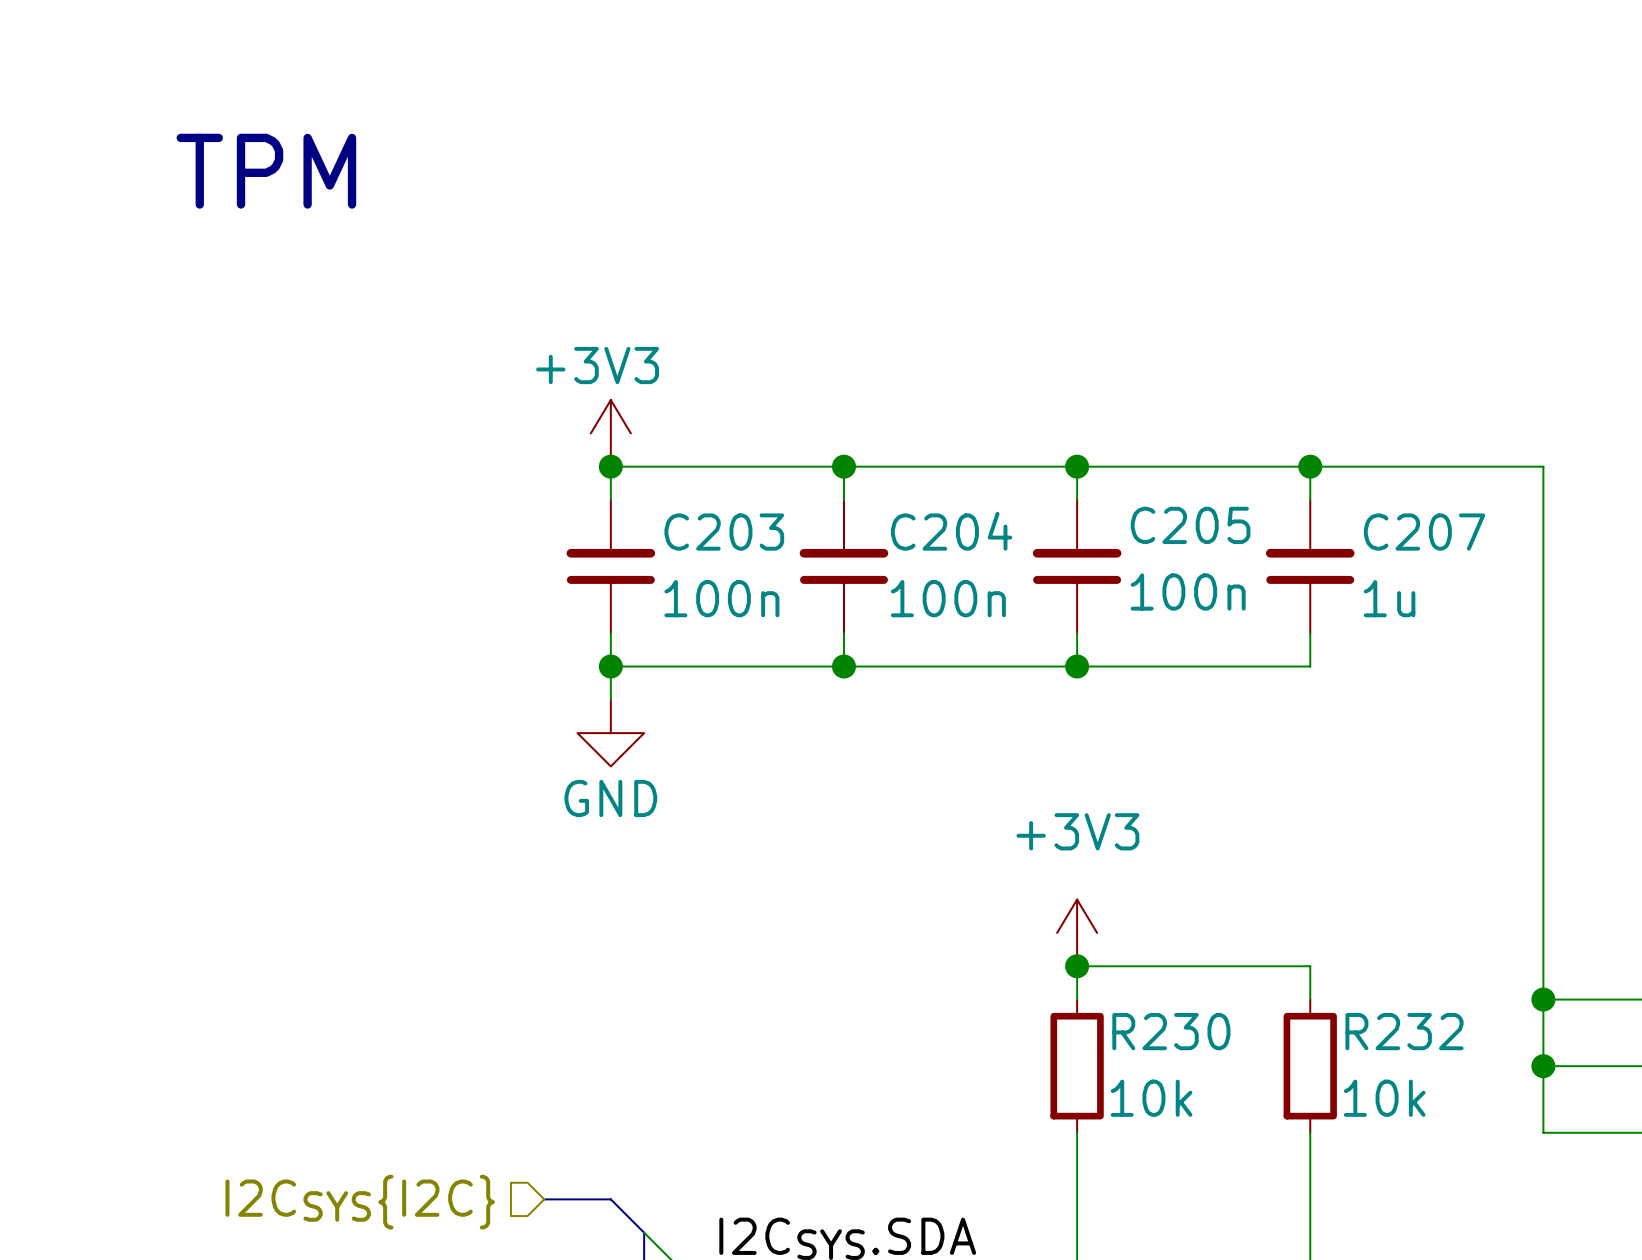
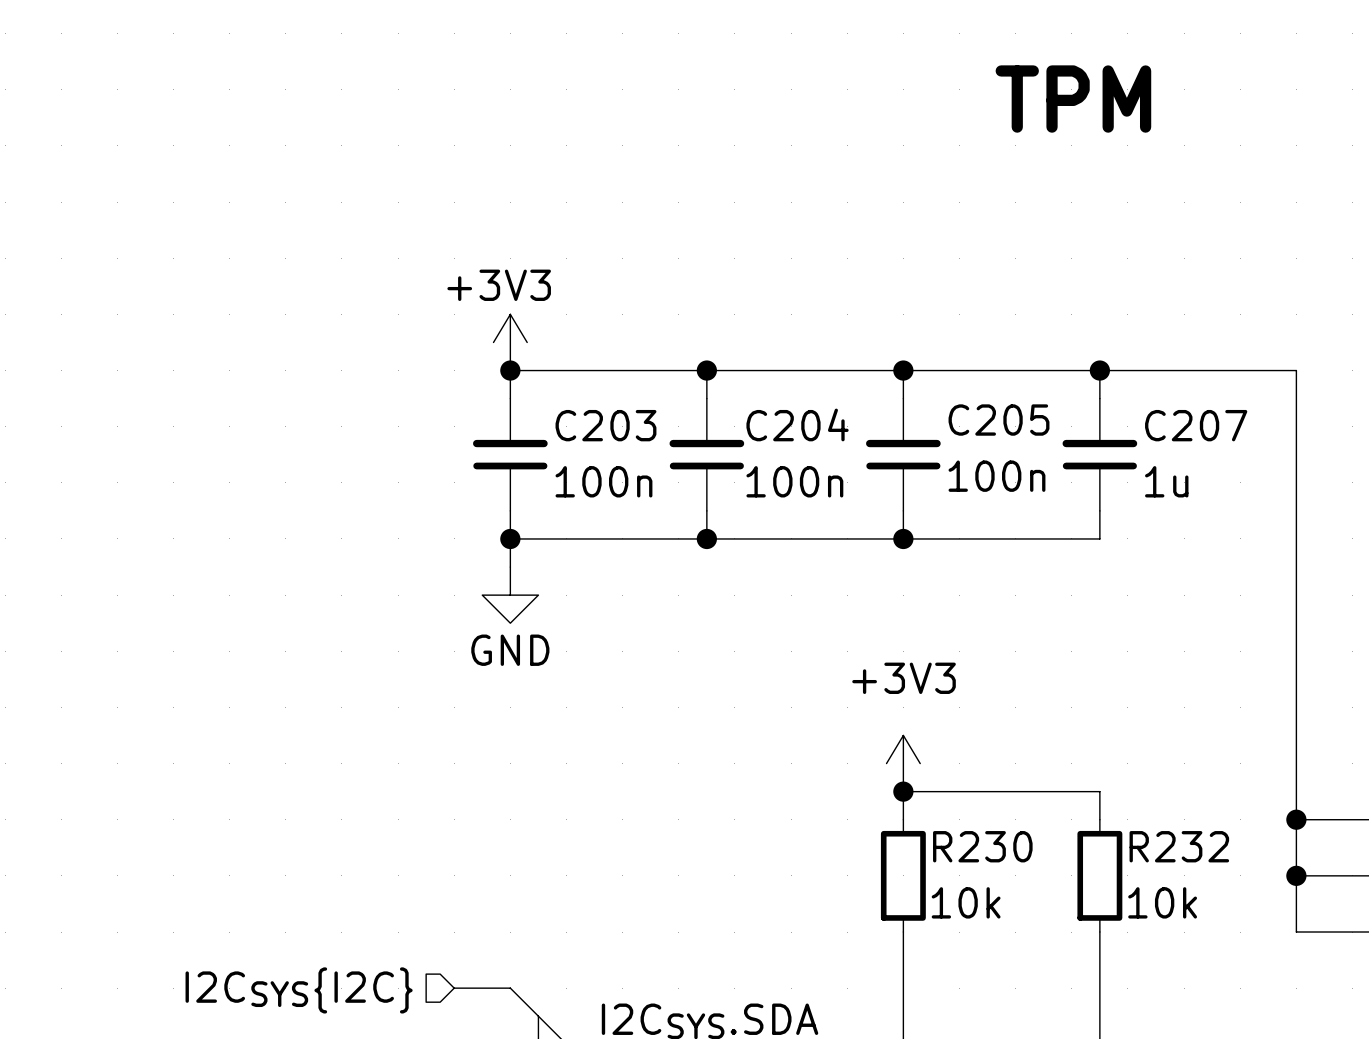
text: none -> TPM (1073, 99)
text: TPM (266, 171) -> none

